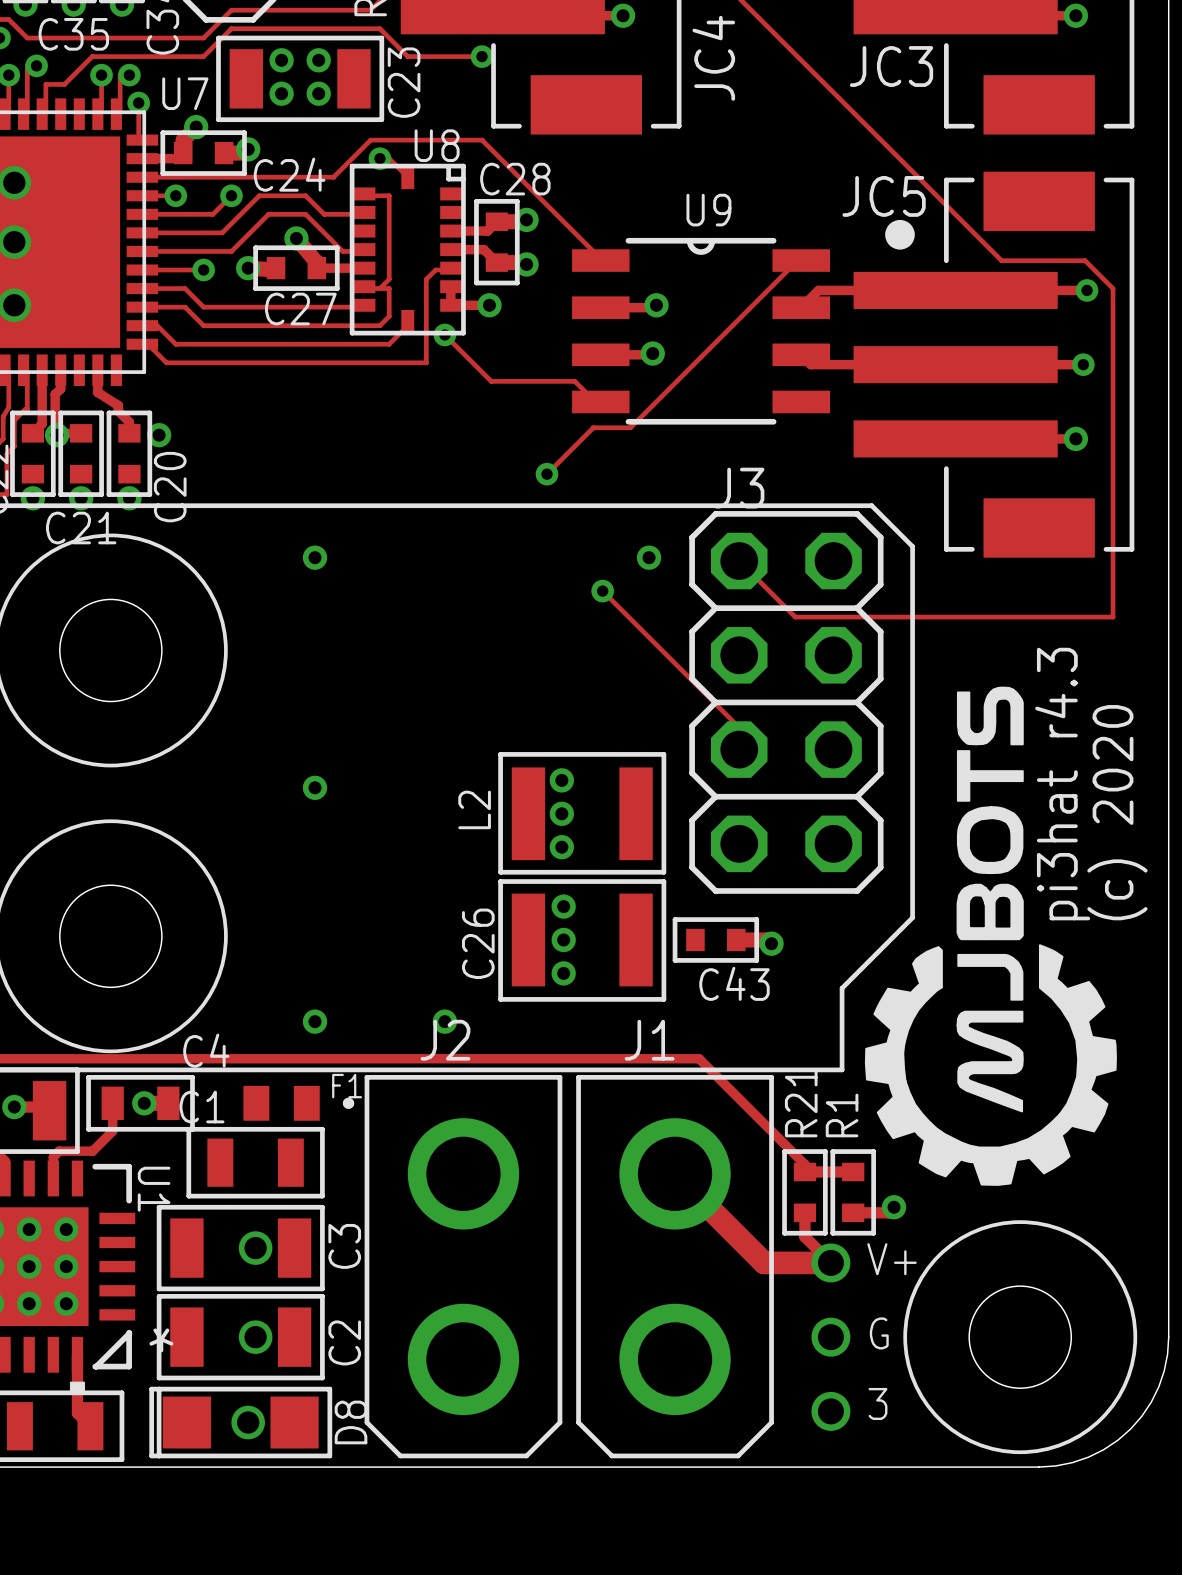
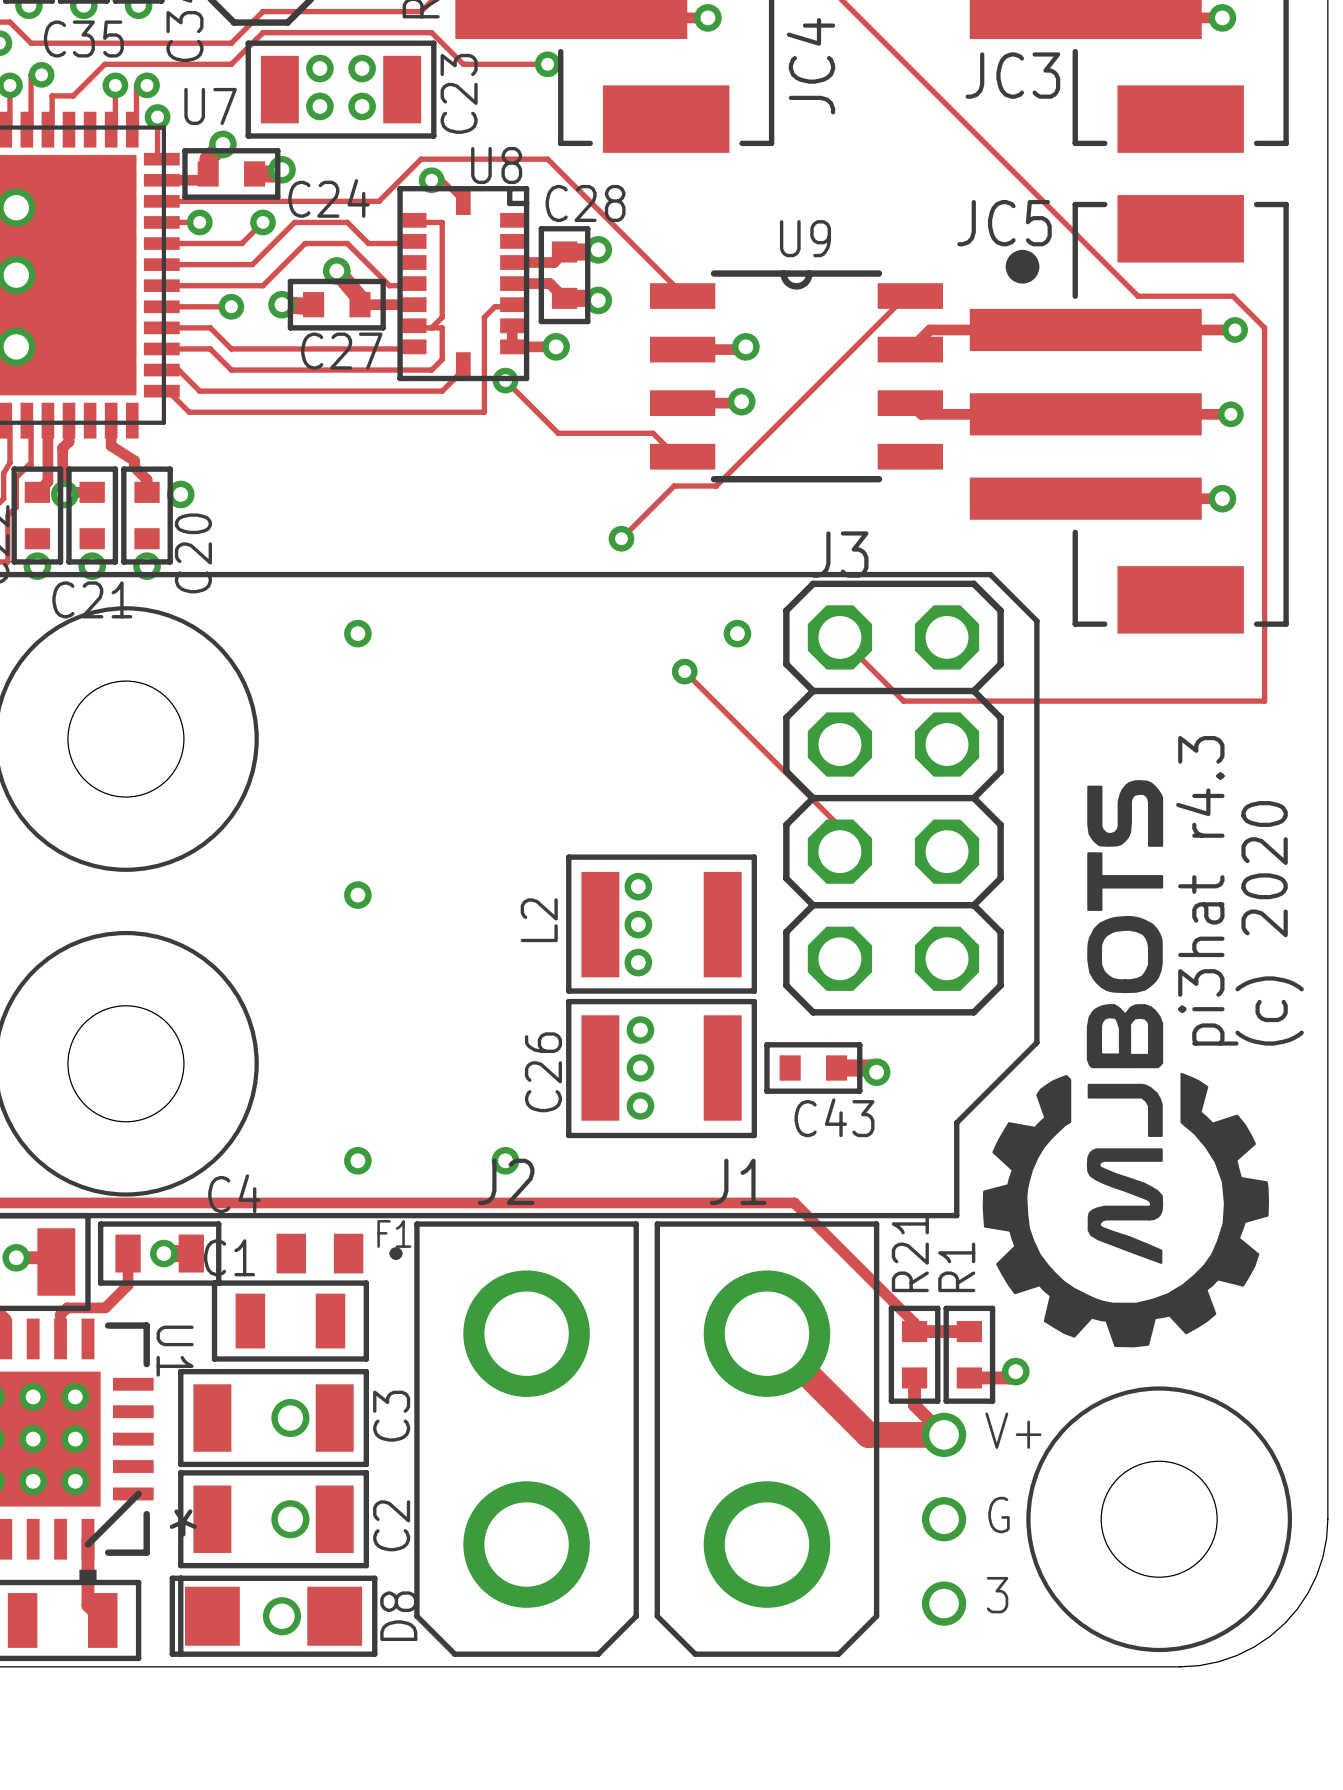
line: none -> (138, 1493) (87, 1544)
line: (129, 1333) (96, 1366) -> none

